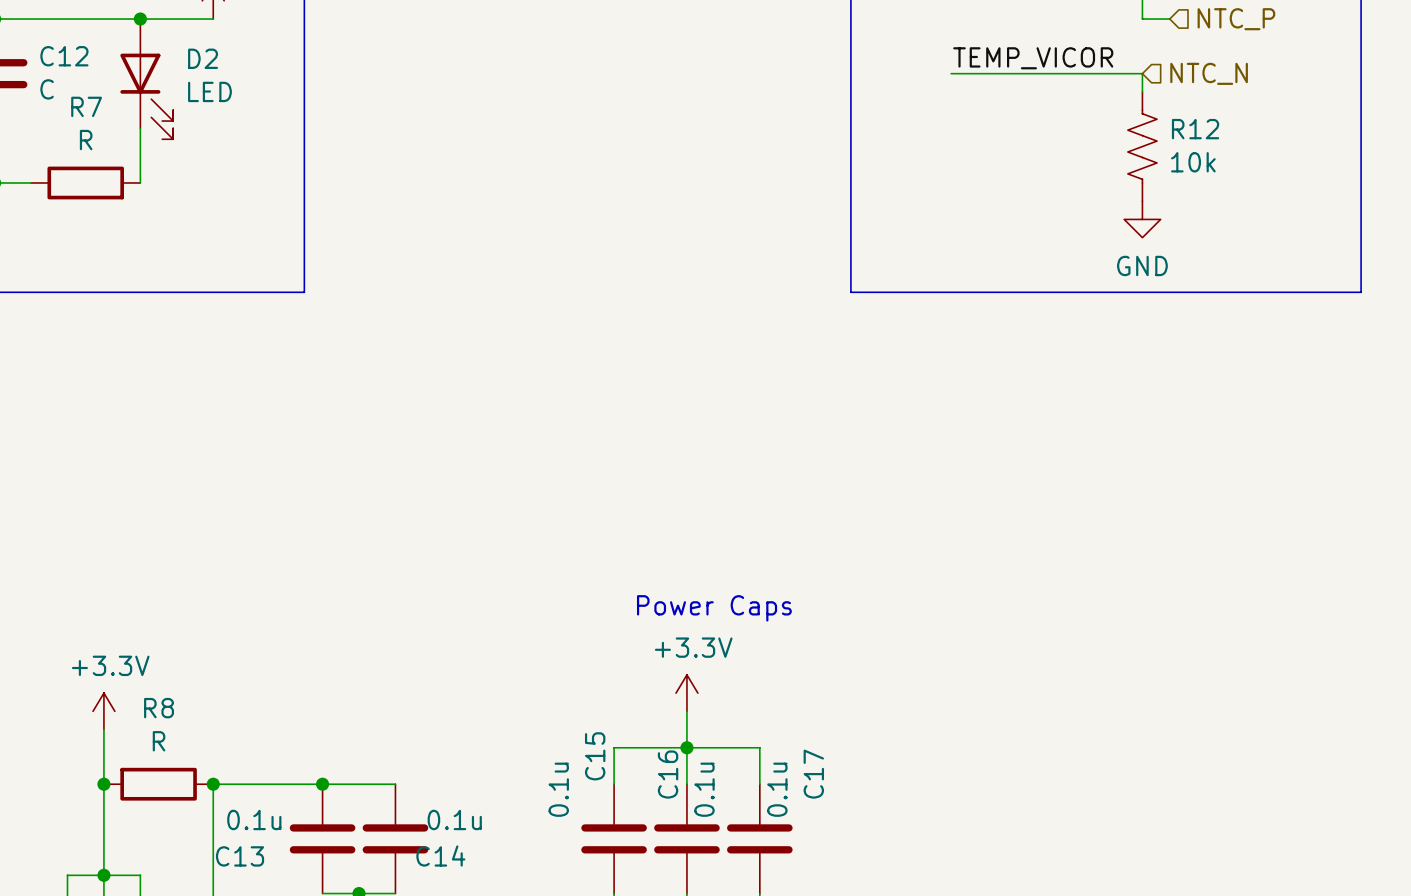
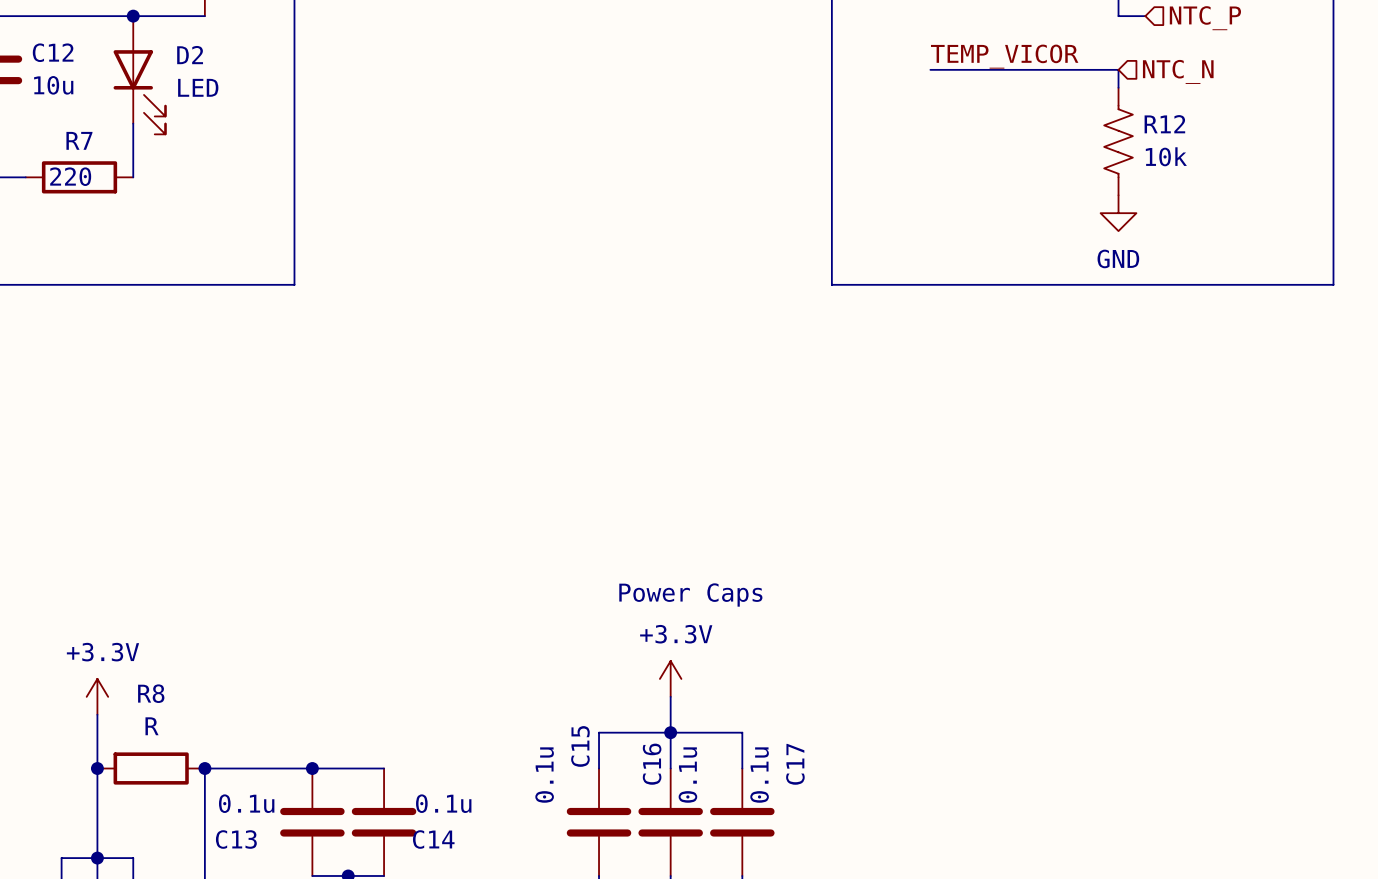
C12 value: C (47, 89) -> 10u (53, 85)
R7 name position: R7 (86, 106) -> R7 (79, 140)
R7 value: R (86, 140) -> 220 (70, 176)

